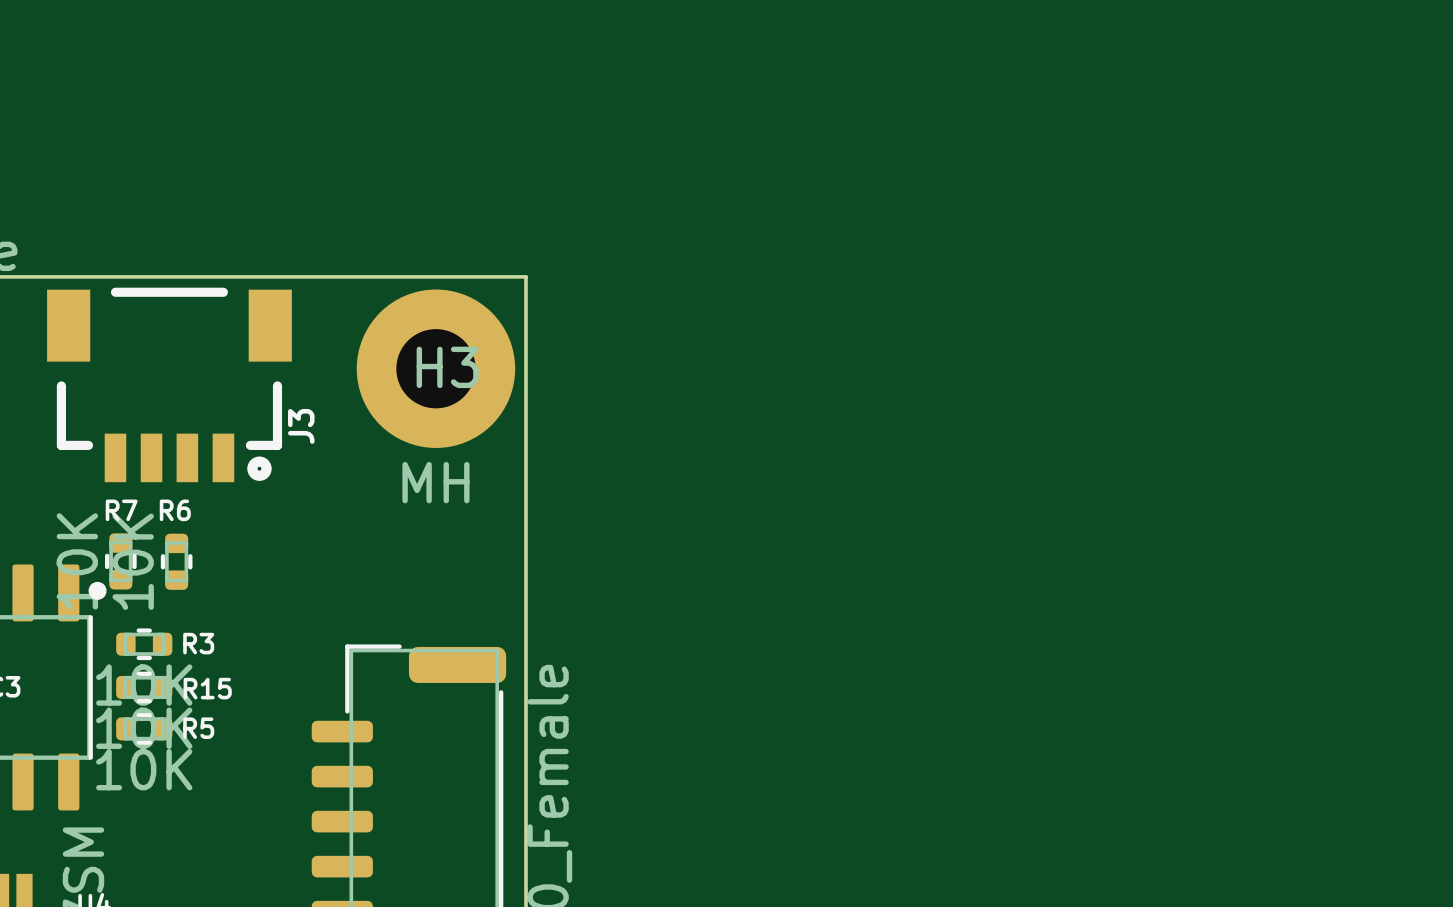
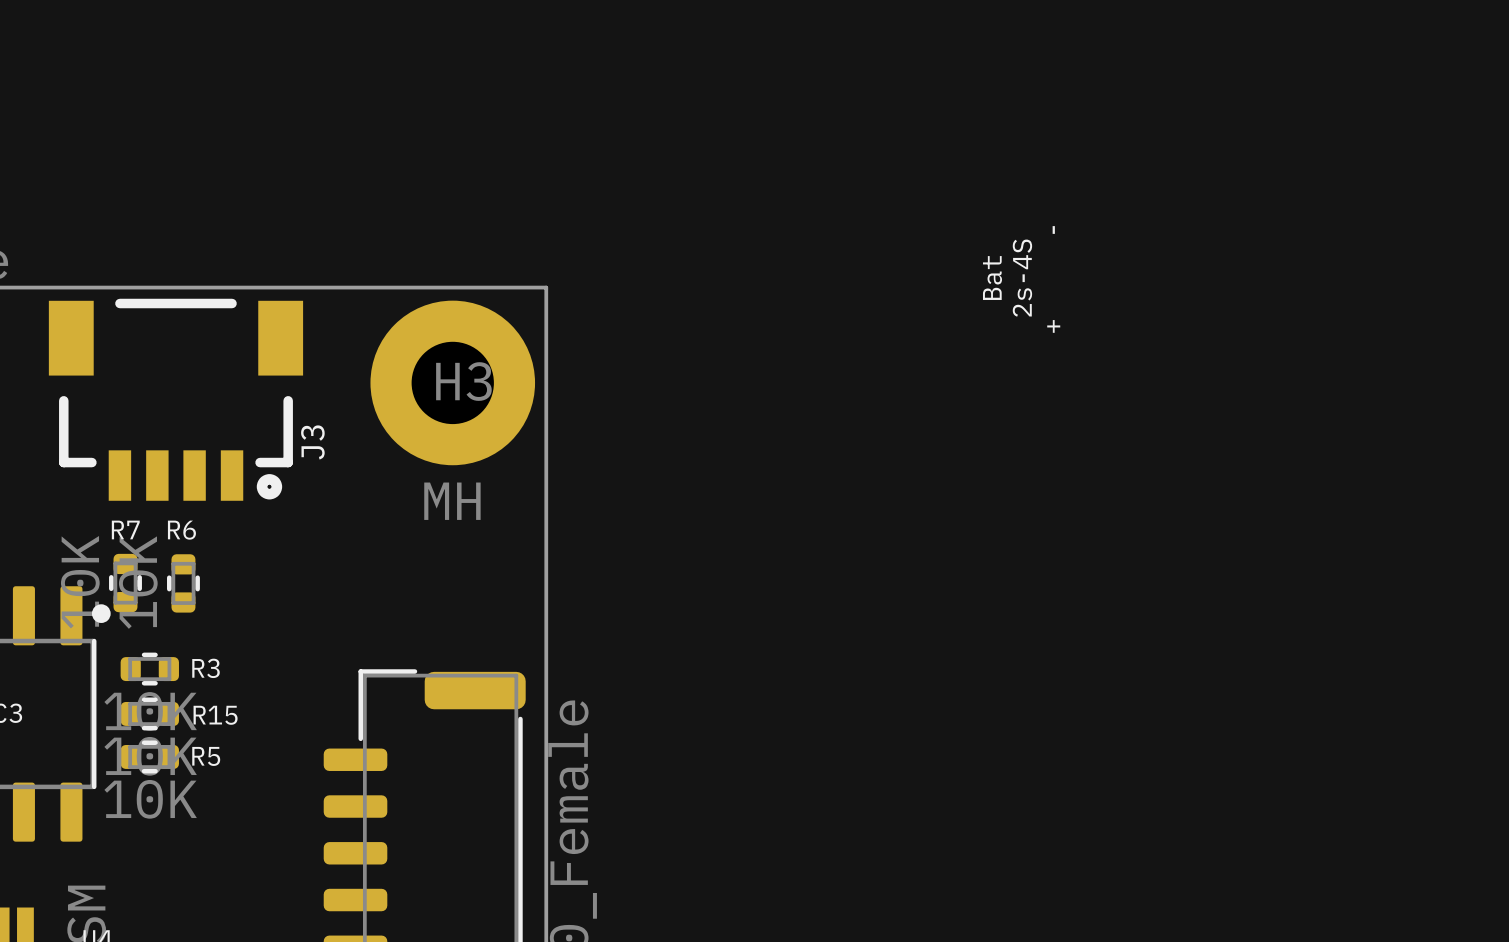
text: none -> Bat (992, 278)
text: none -> + - (1053, 279)
text: none -> 2s-4S (1022, 278)

